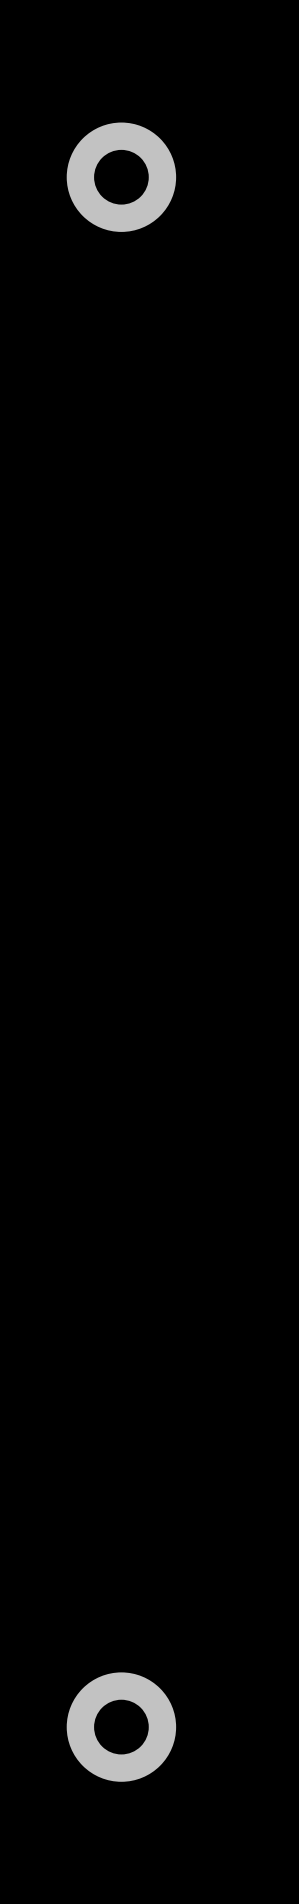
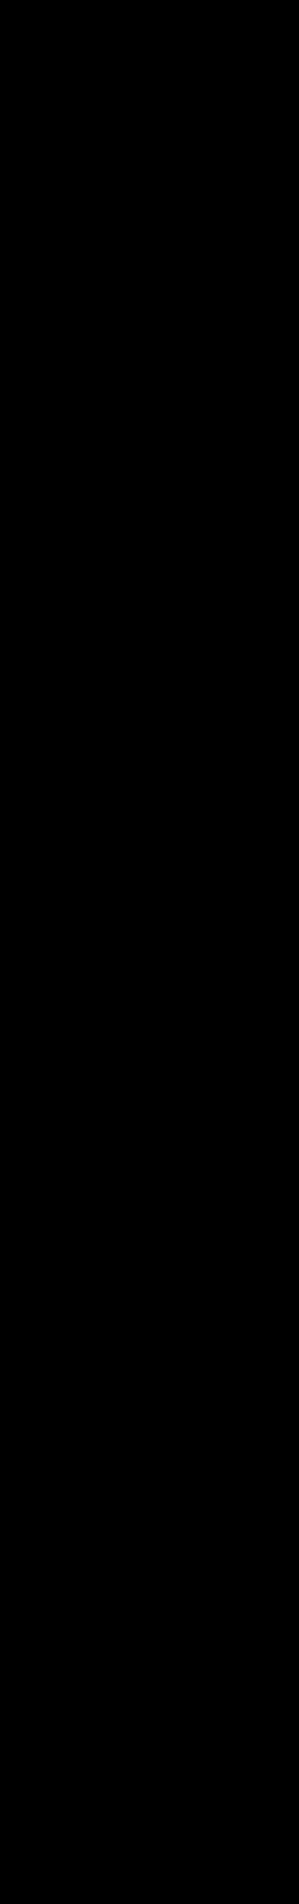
via: (121, 177) -> none
via: (121, 1727) -> none

